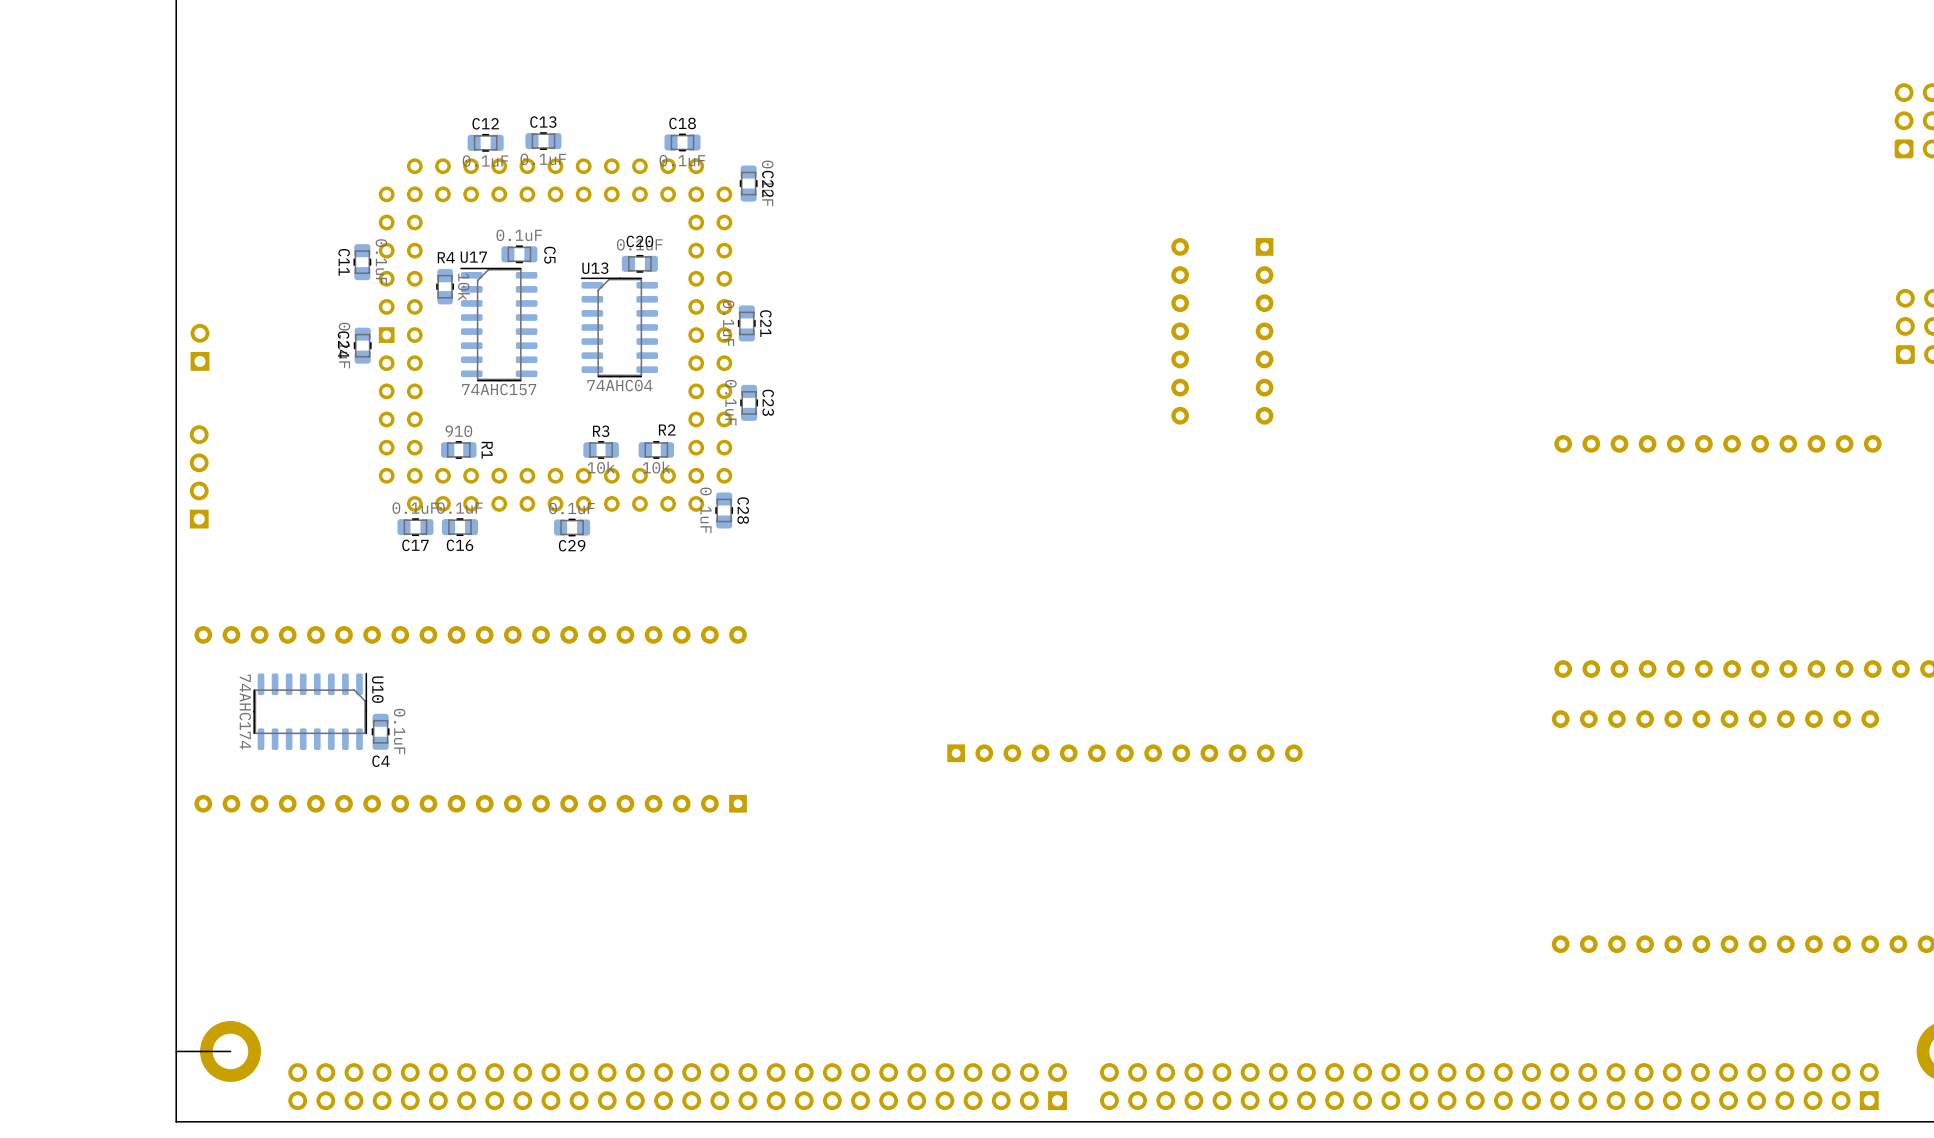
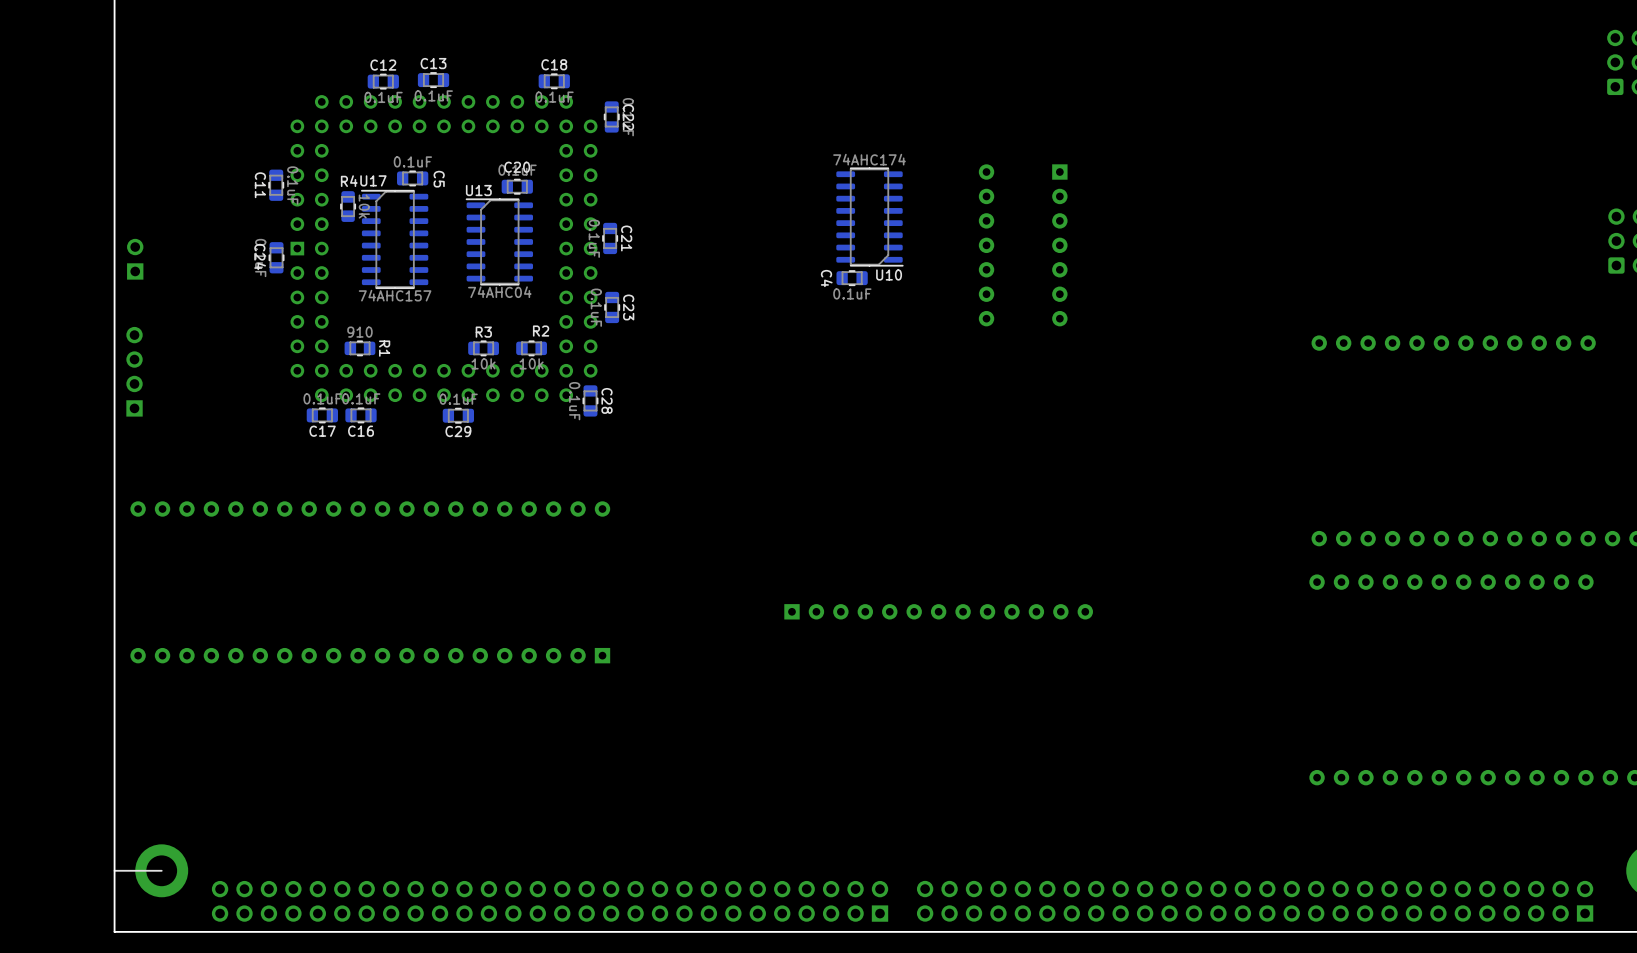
U10 rotation: 0° (310, 711) -> 90° clockwise (869, 217)
U10 position: (310, 711) -> (869, 217)
C4 rotation: 0° (380, 731) -> 90° clockwise (852, 278)
C4 position: (380, 731) -> (852, 278)

